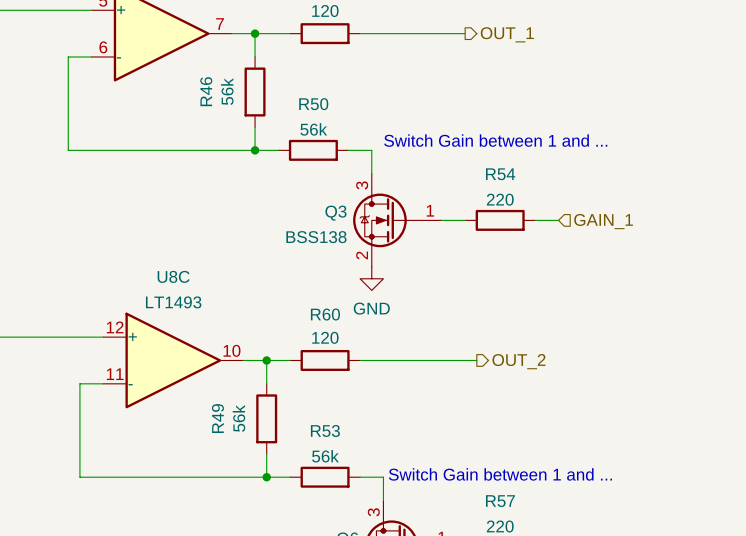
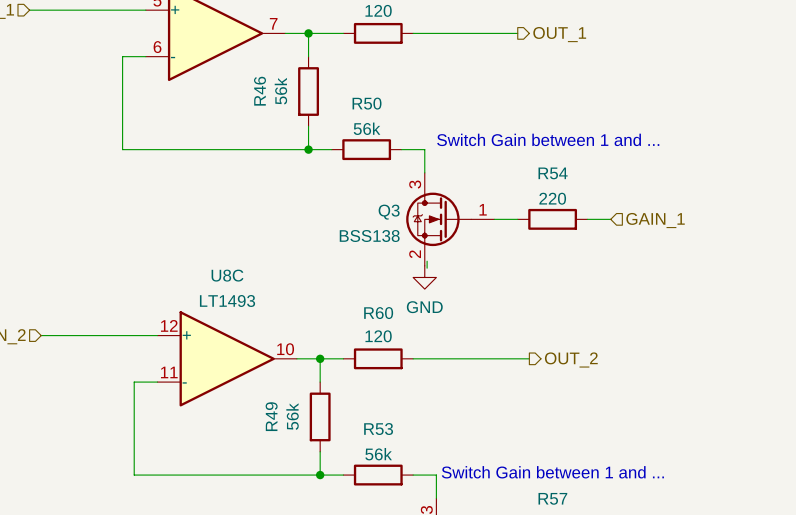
wire: none -> (427, 261) (427, 268)

